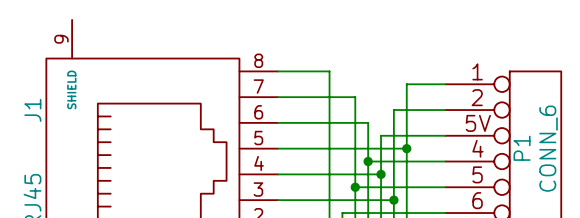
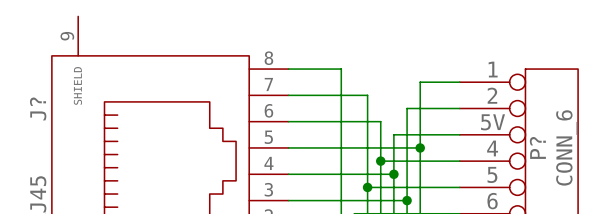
J1 name: J1 (32, 110) -> J? (38, 108)
P1 name: P1 (522, 148) -> P? (537, 147)

